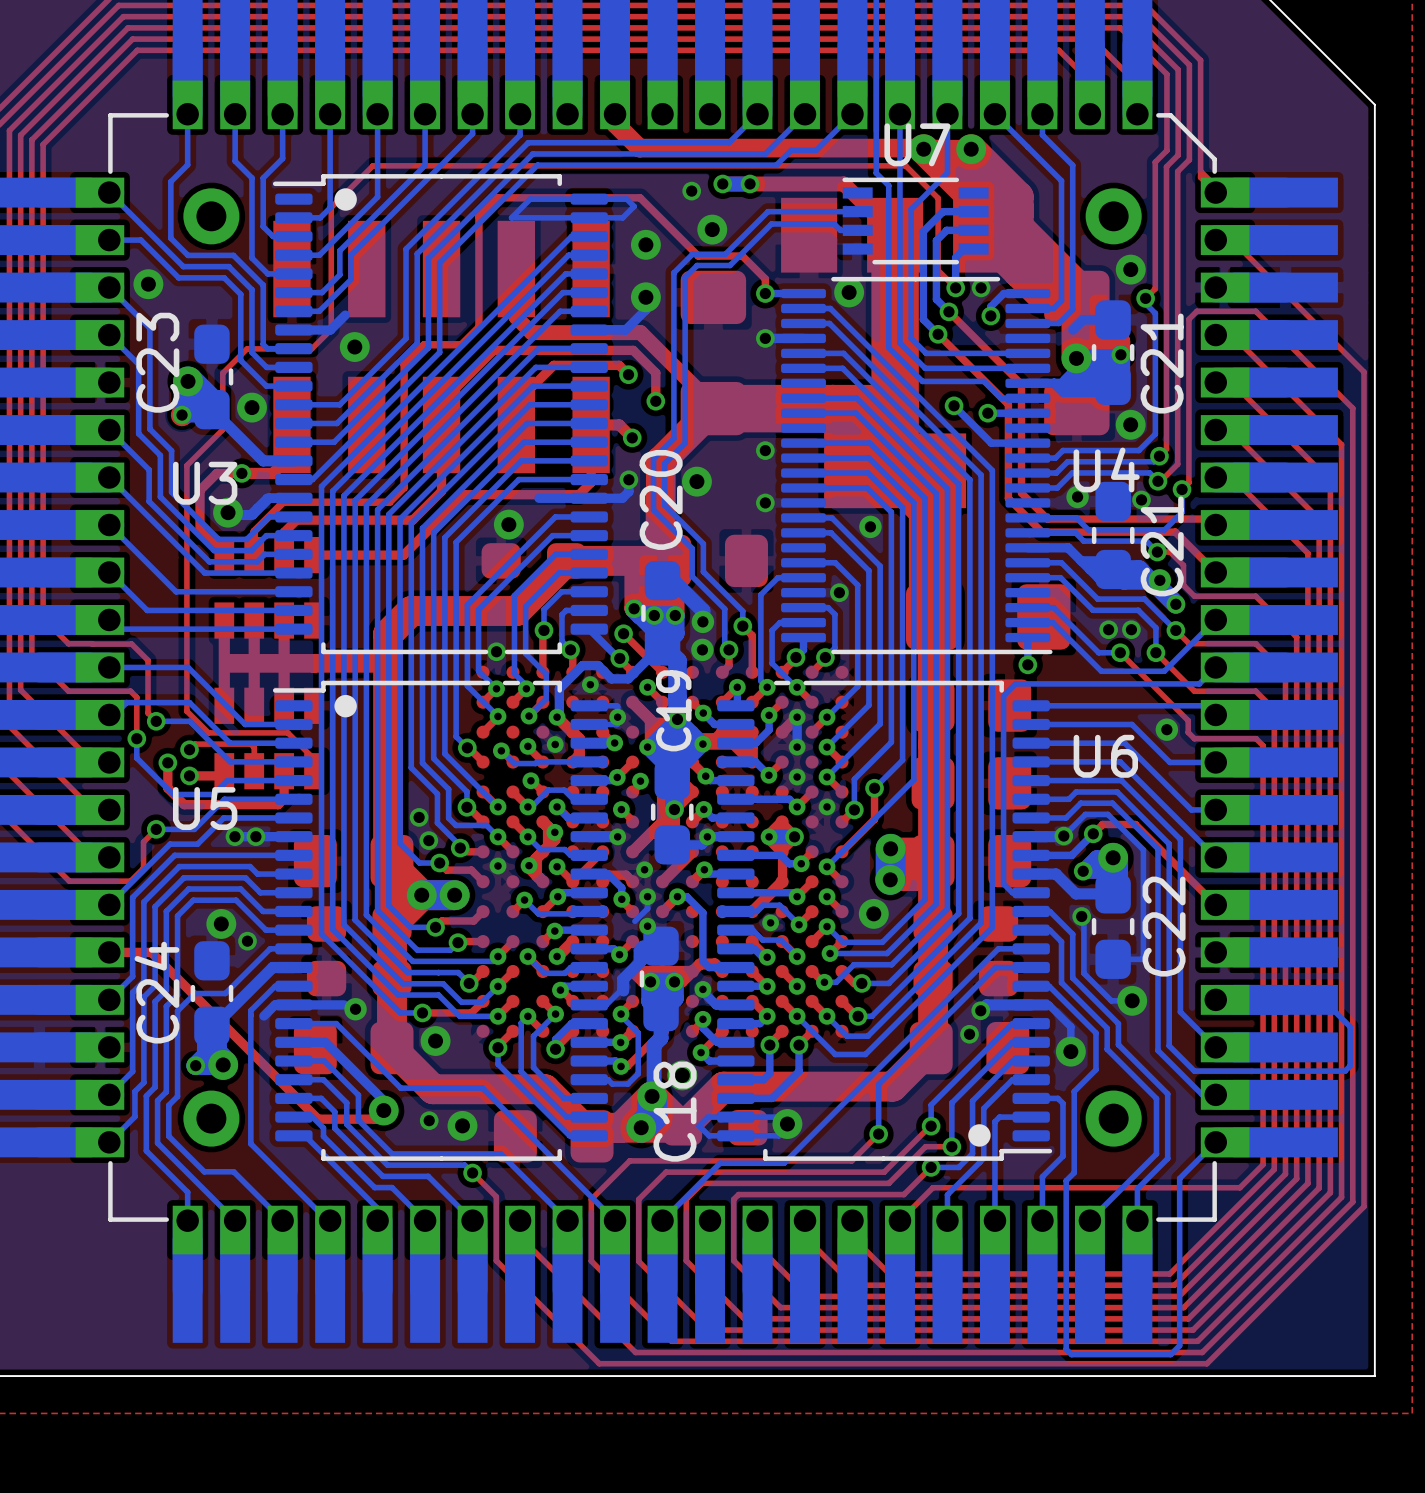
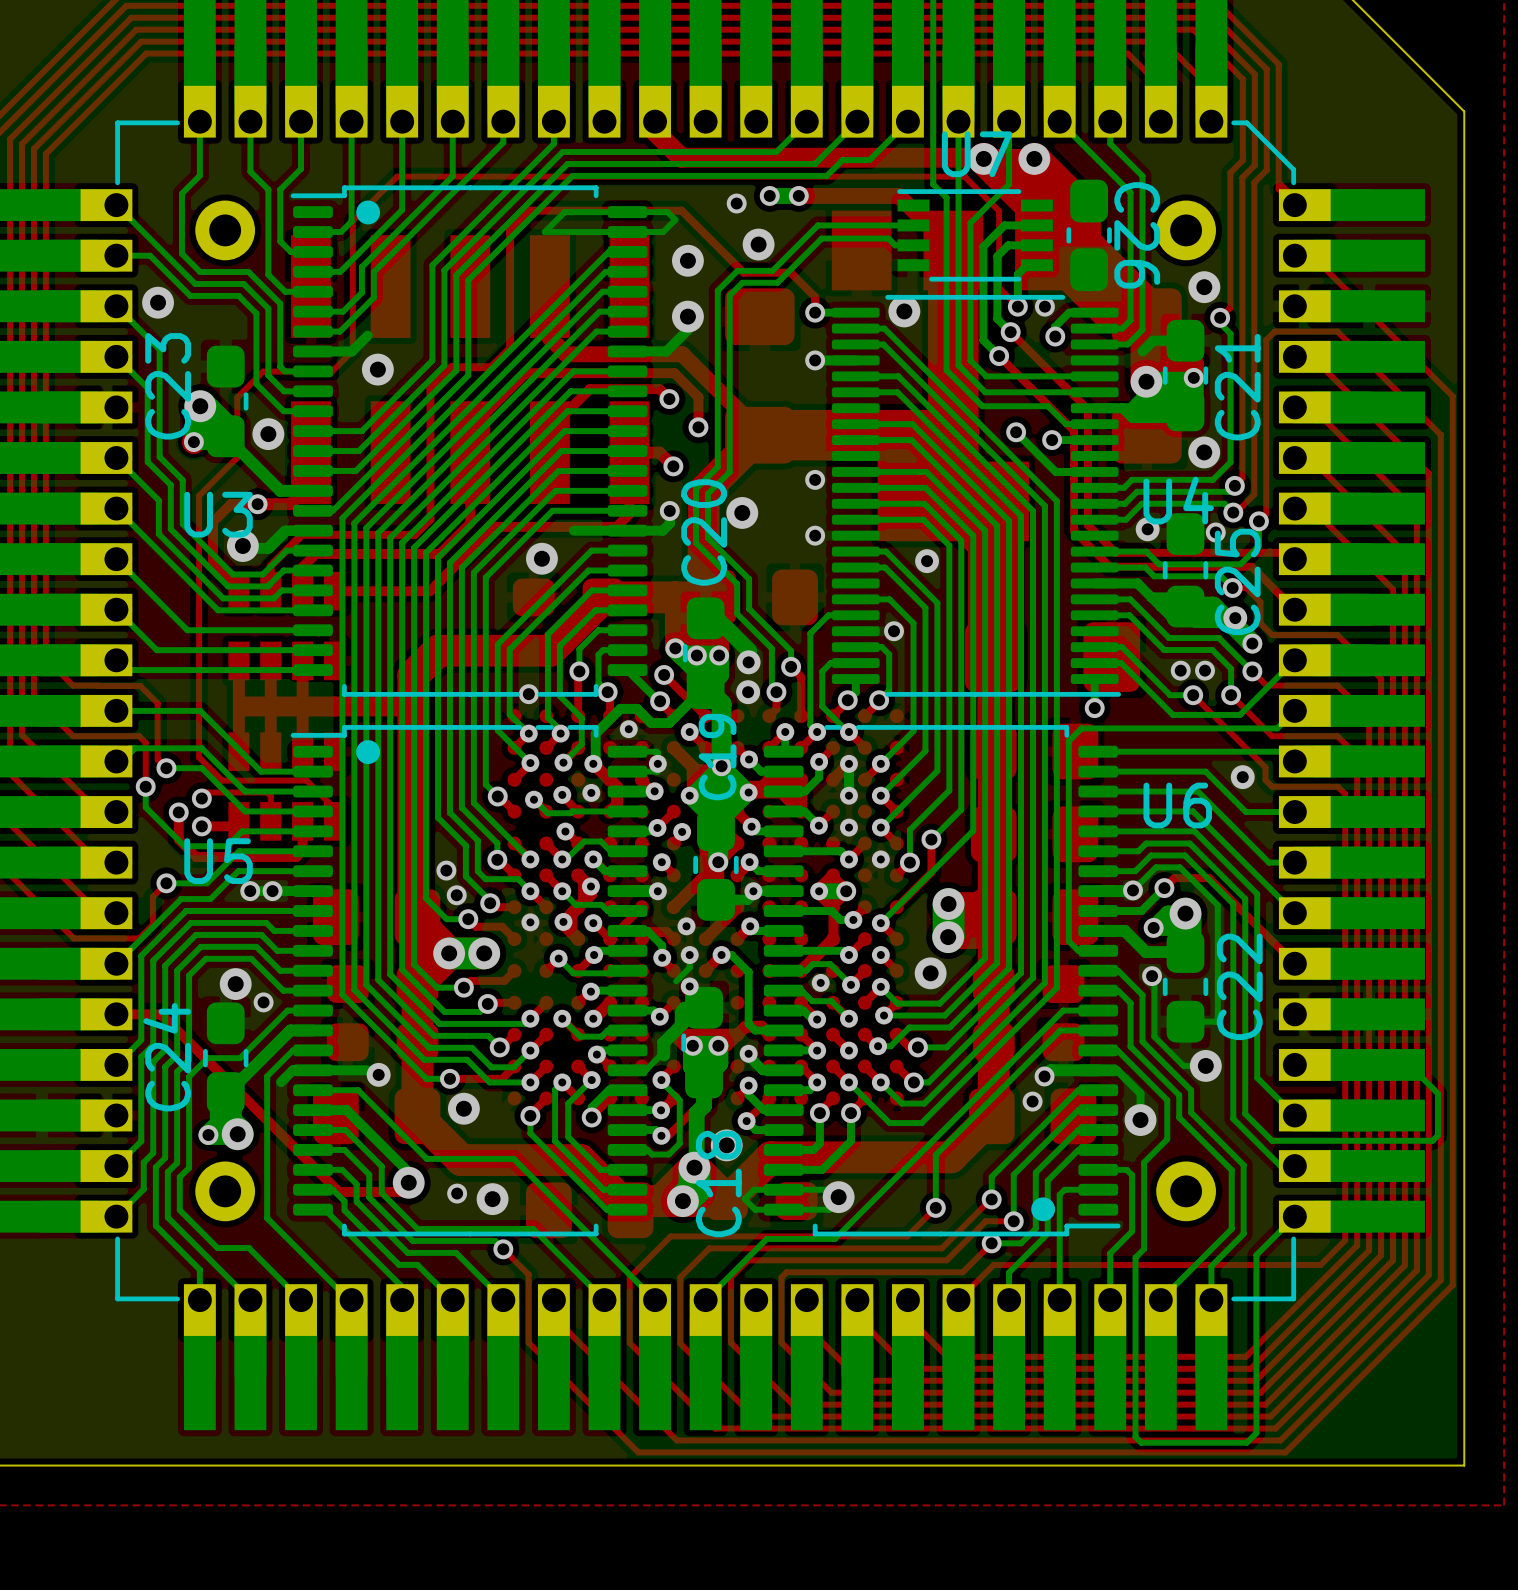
C26: none -> (1089, 235)
C21 name: C21 (1162, 546) -> C25 (1237, 581)

